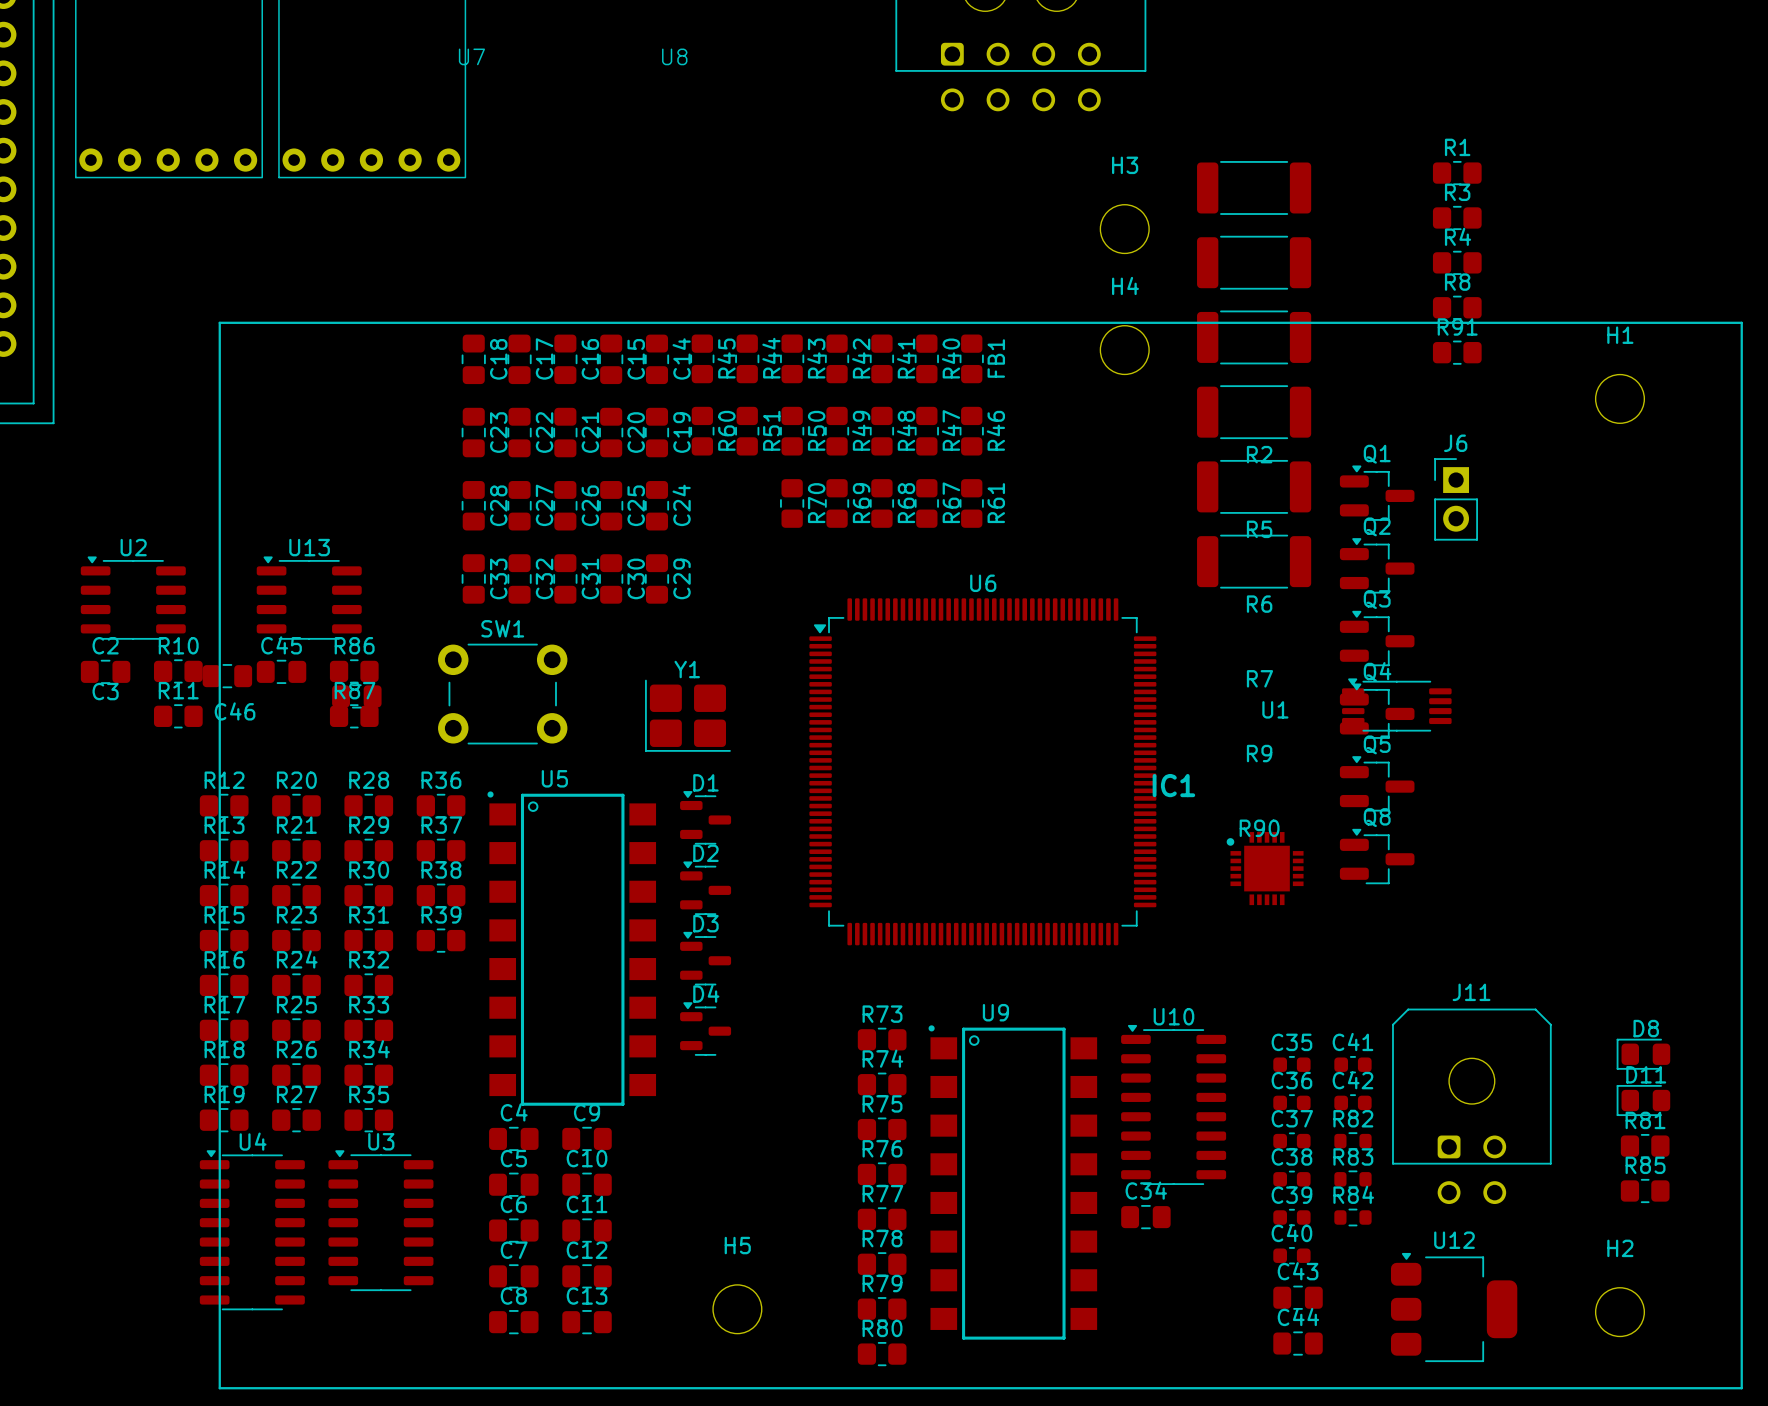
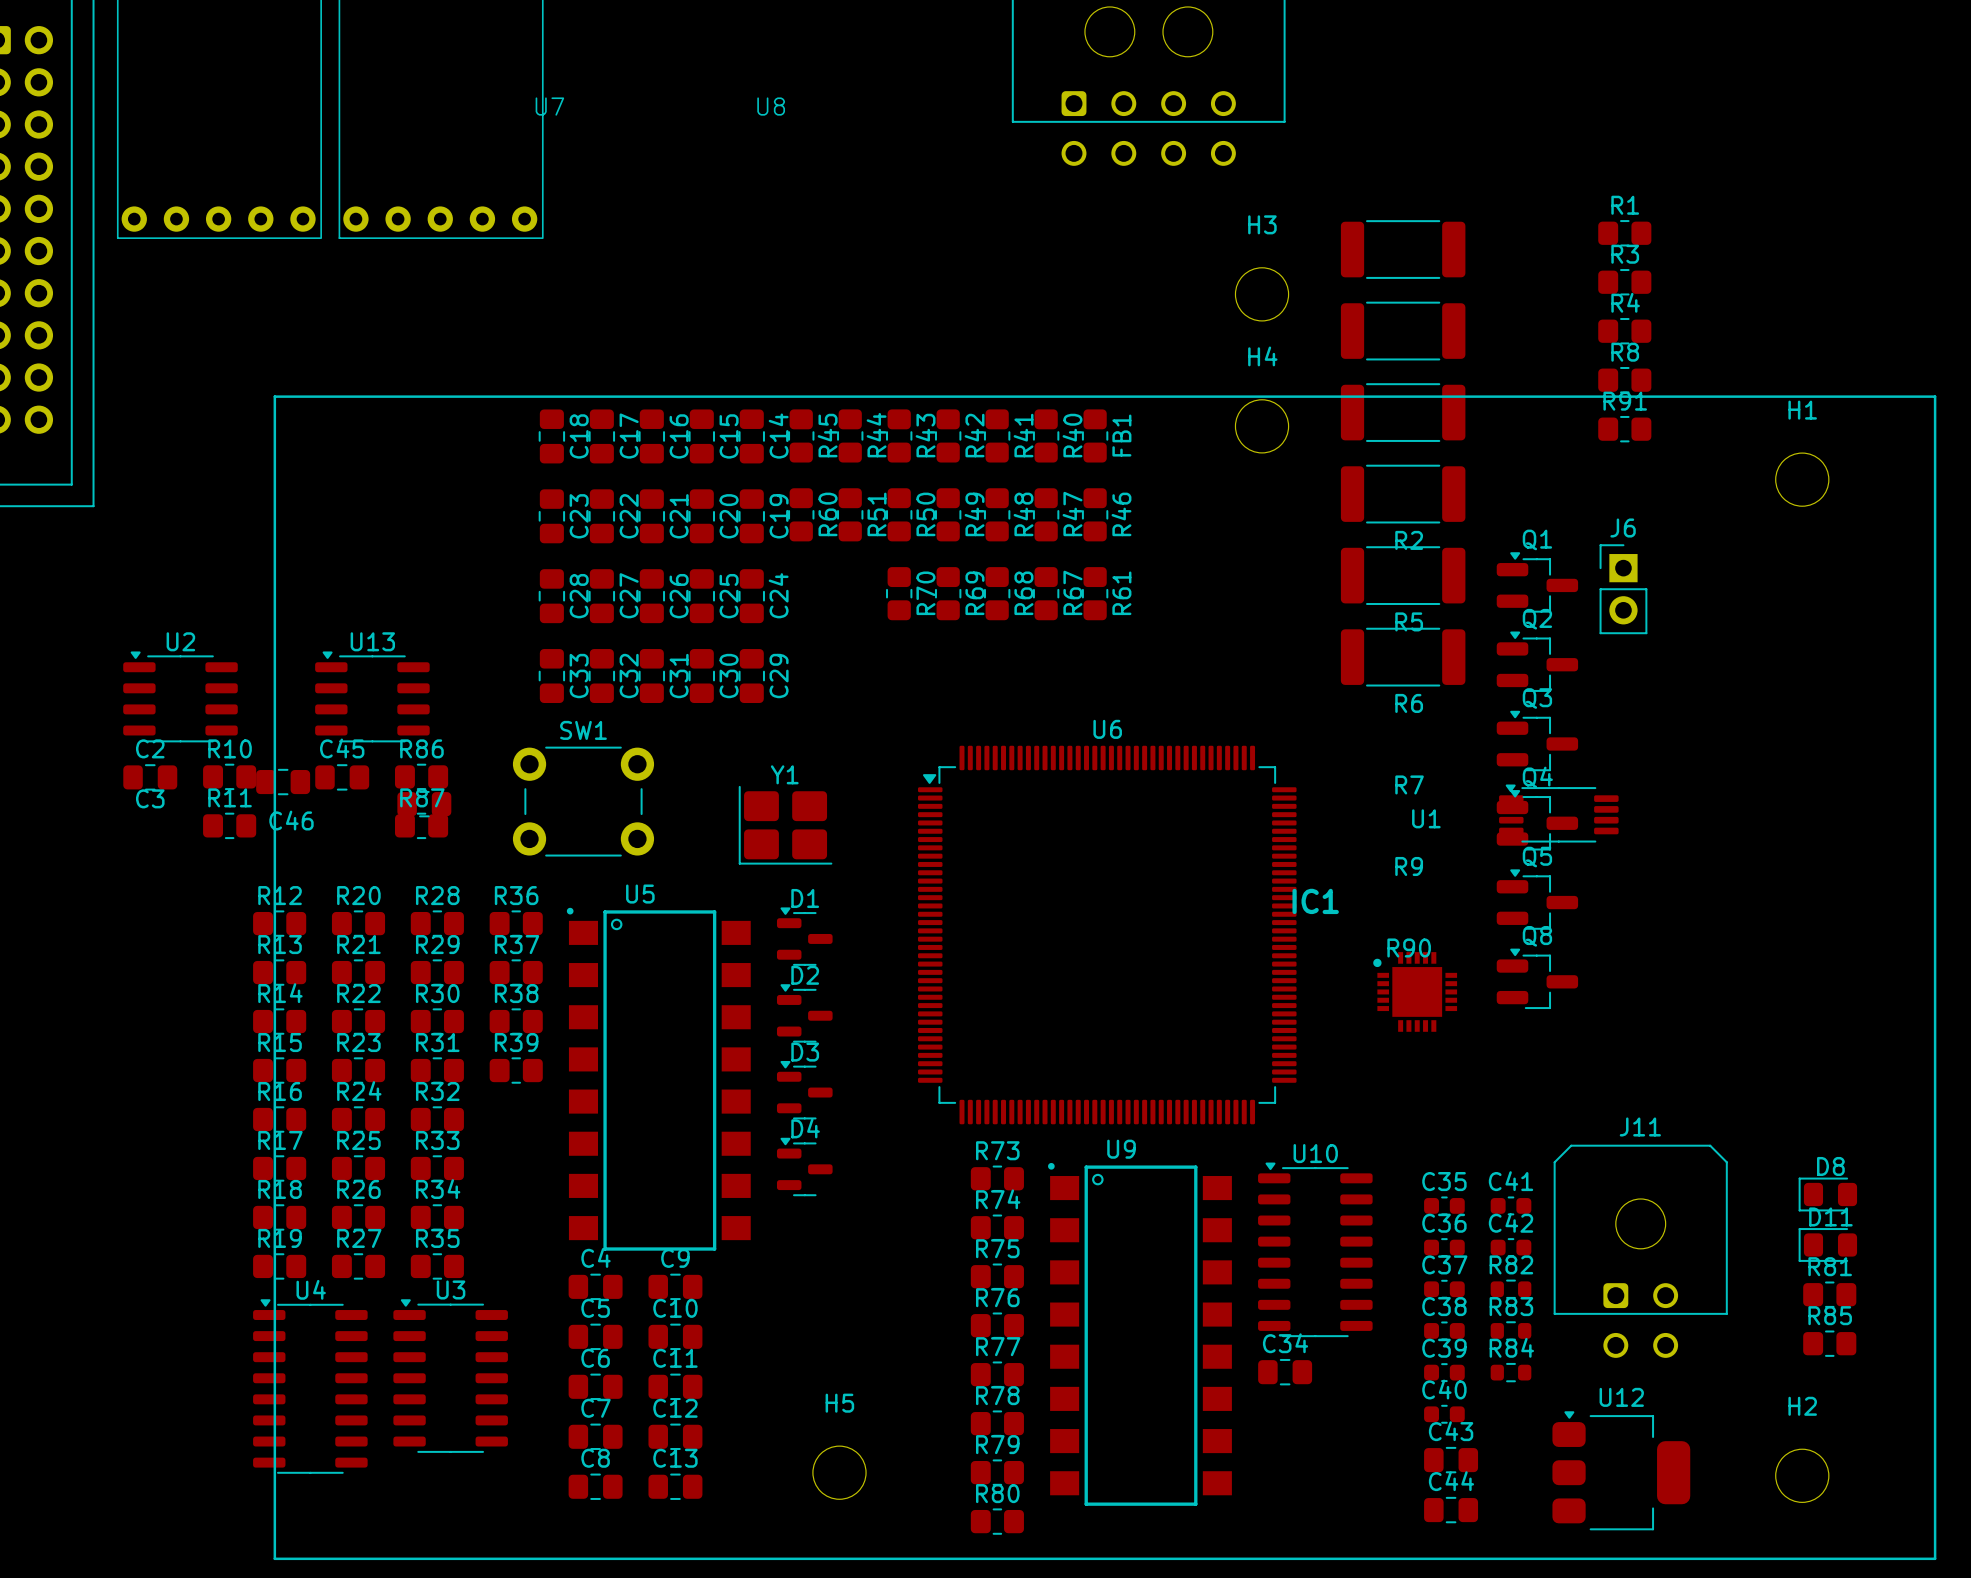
U6 position: (982, 771) -> (1107, 935)

